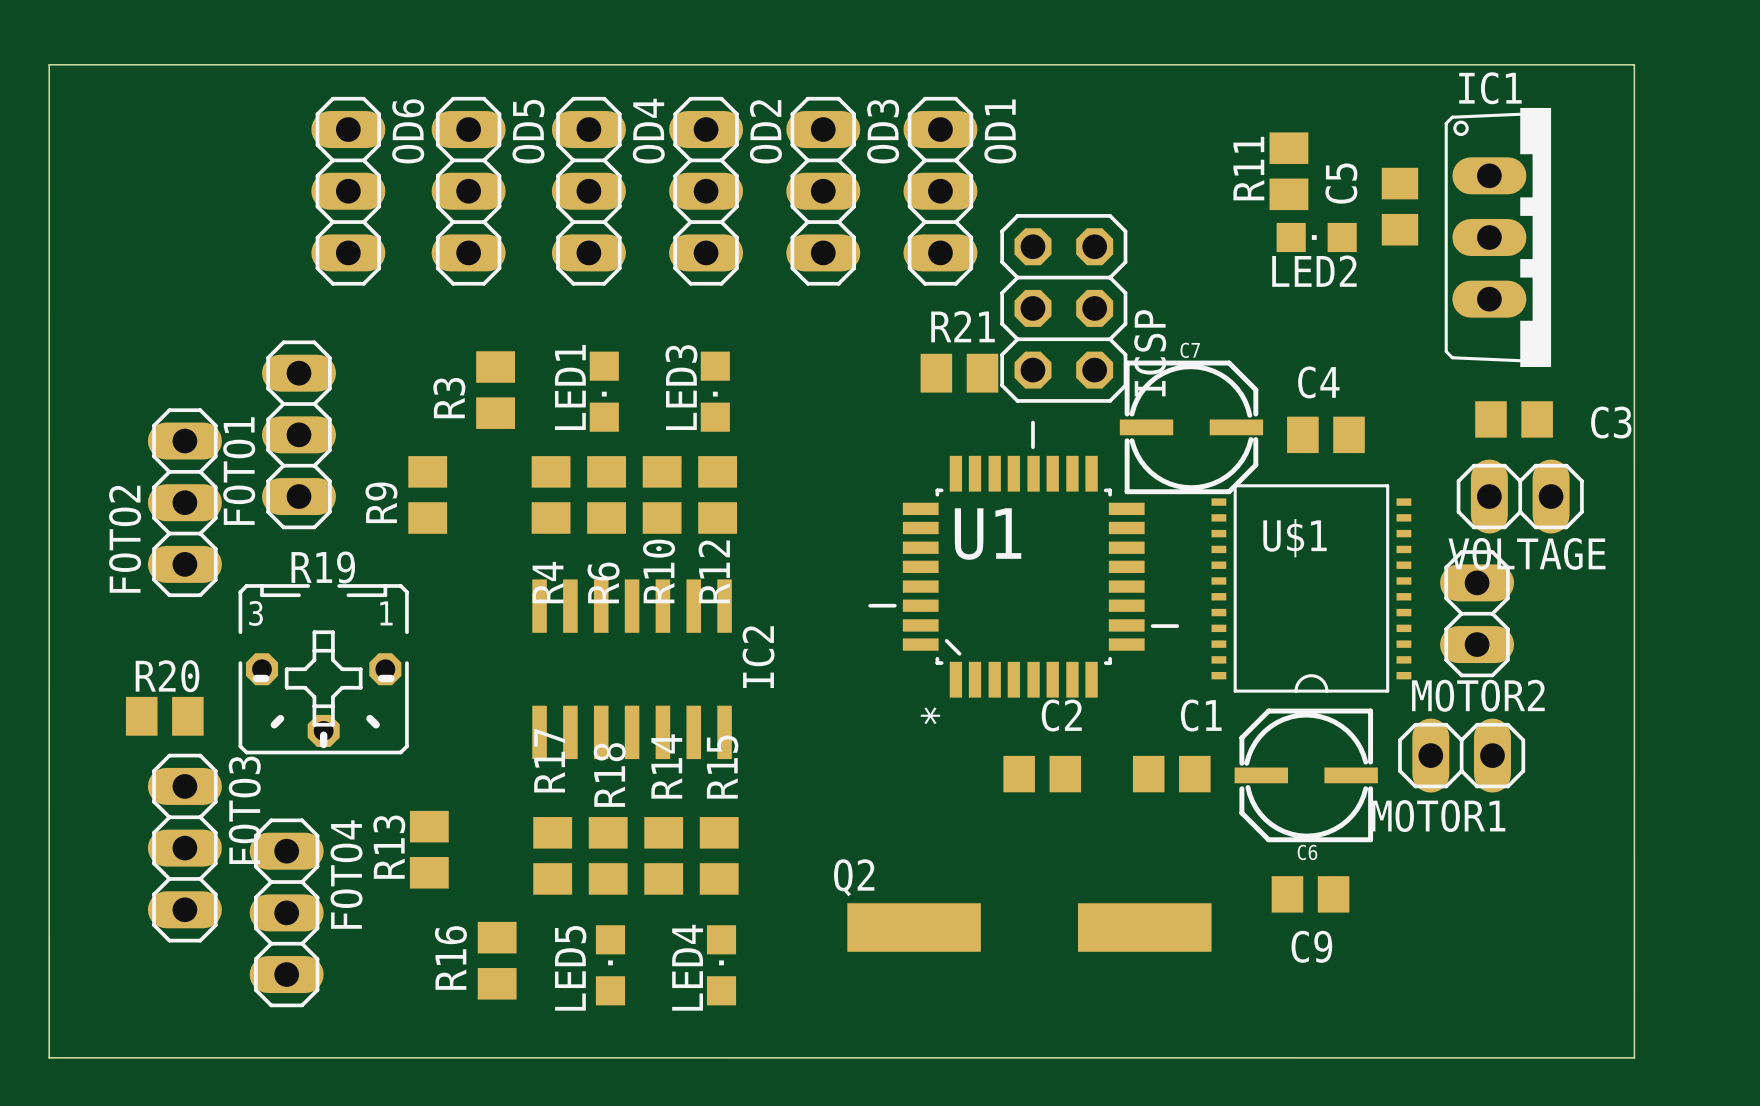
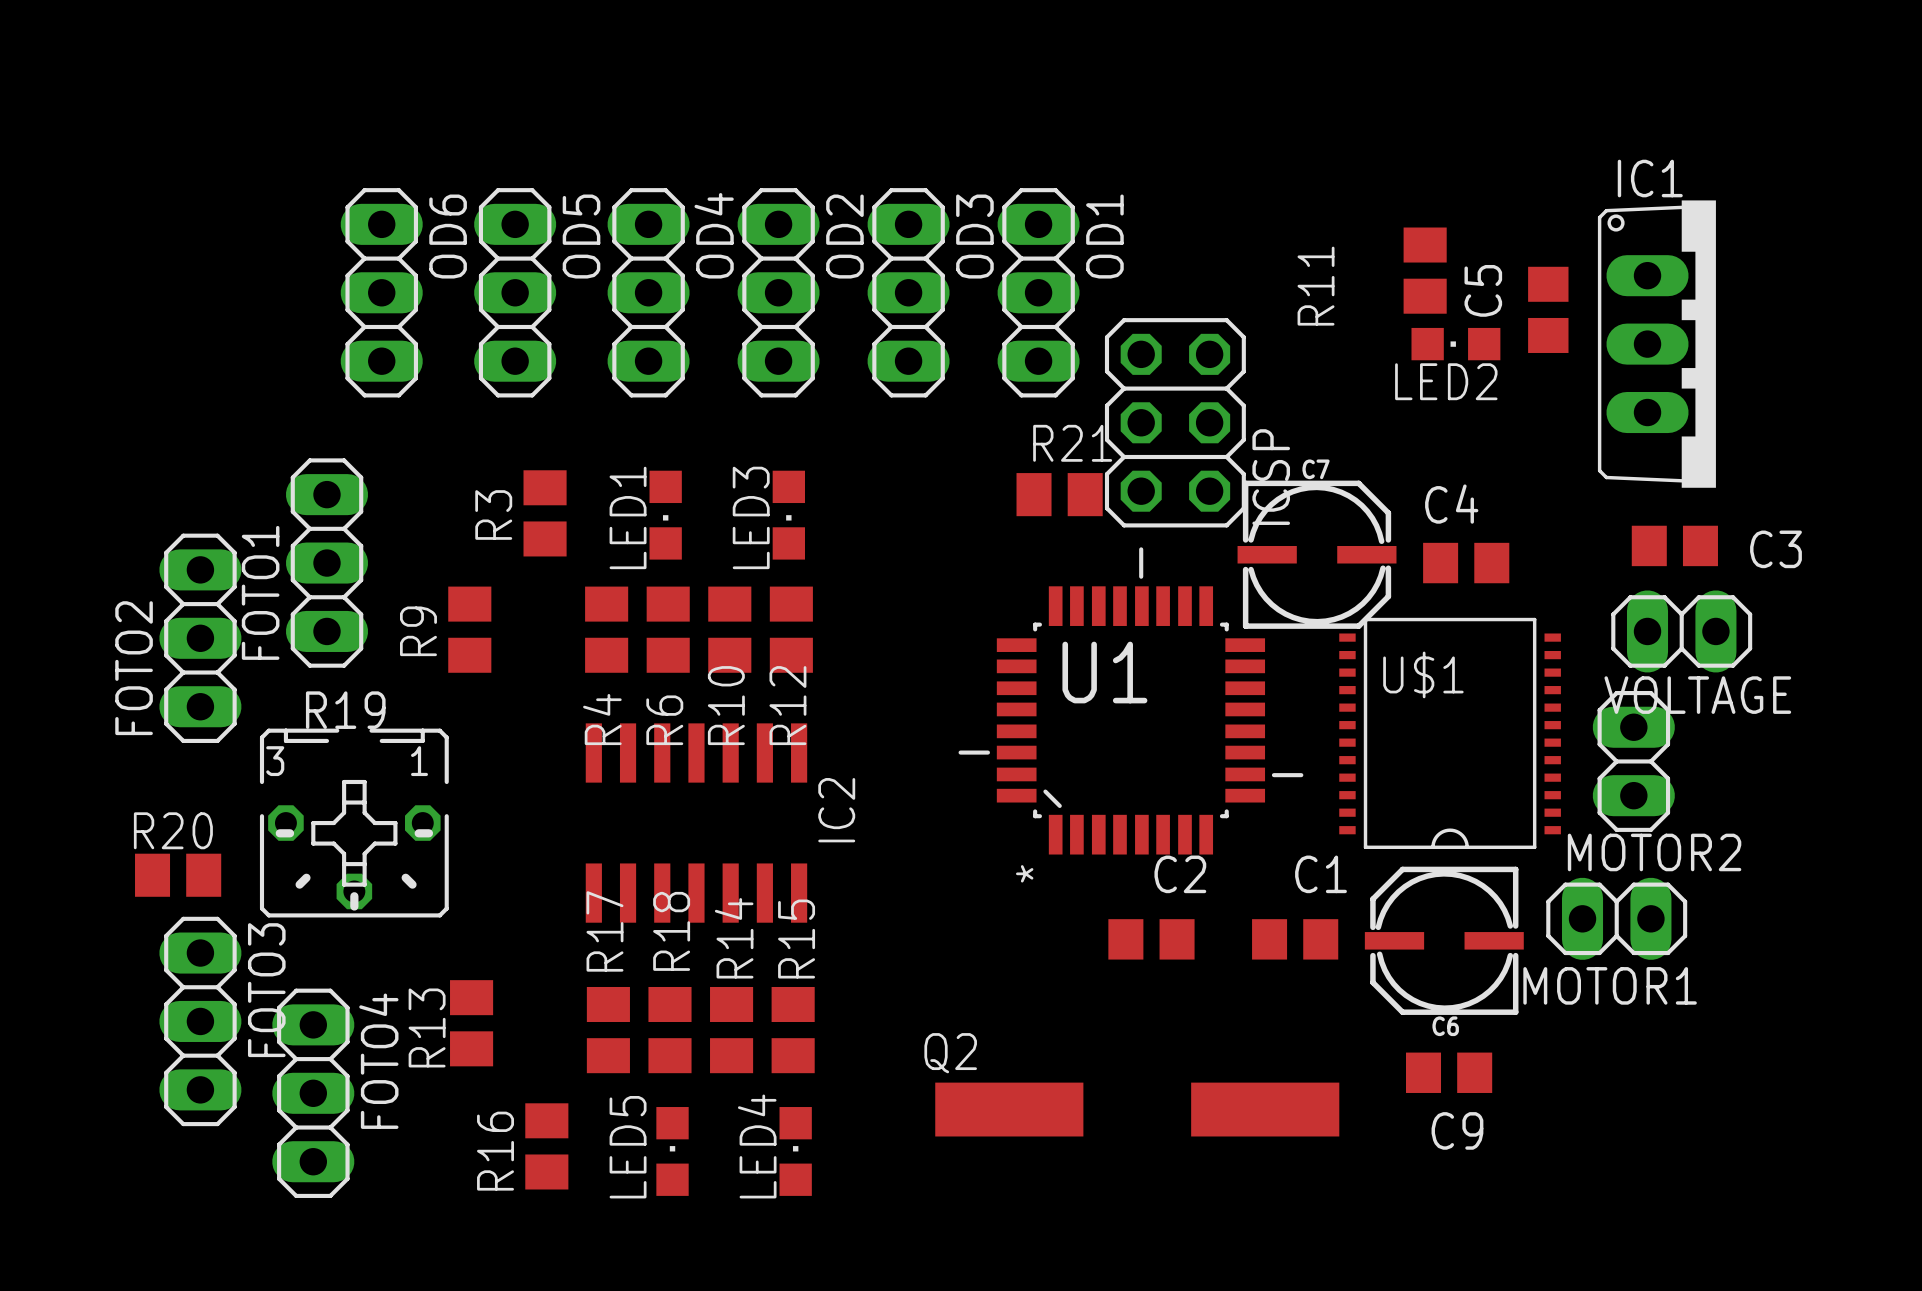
board edge: (49, 64) (1634, 64) (1634, 1057) (49, 1057) (49, 64) -> none
R11 name position: R11 (1248, 168) -> R11 (1316, 286)

